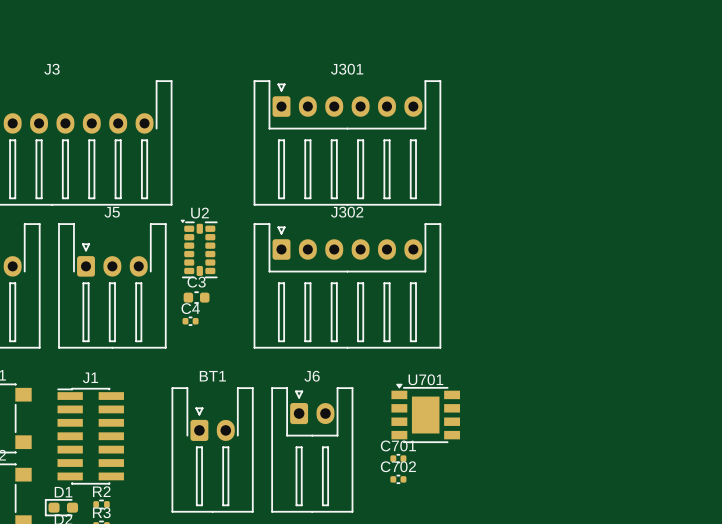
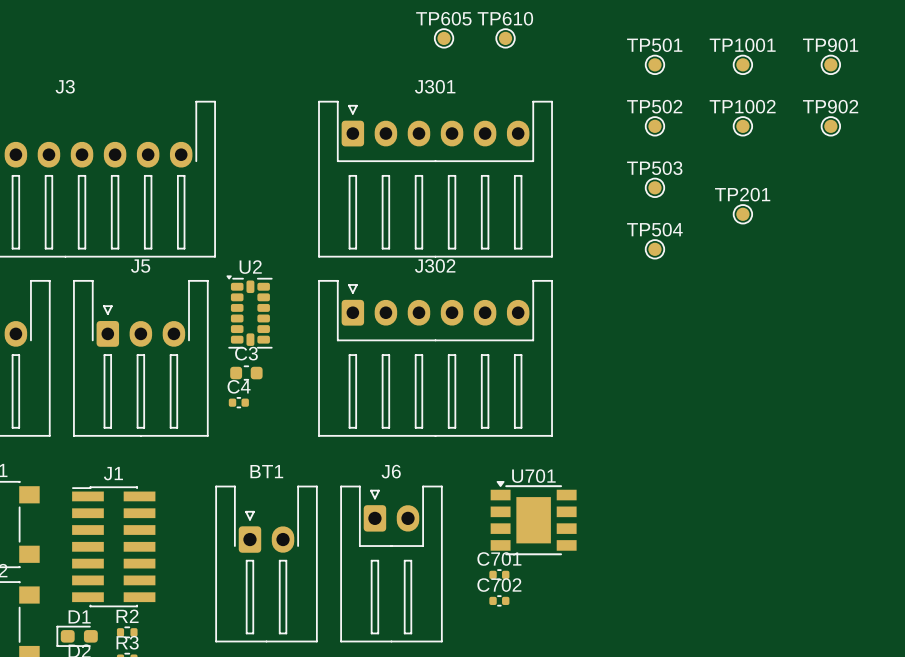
TP605: none -> (444, 38)
TP610: none -> (505, 38)
TP501: none -> (654, 64)
TP1001: none -> (742, 64)
TP901: none -> (830, 64)
TP502: none -> (654, 126)
TP1002: none -> (742, 126)
TP902: none -> (830, 126)
TP503: none -> (654, 187)
TP201: none -> (742, 214)
TP504: none -> (654, 249)

